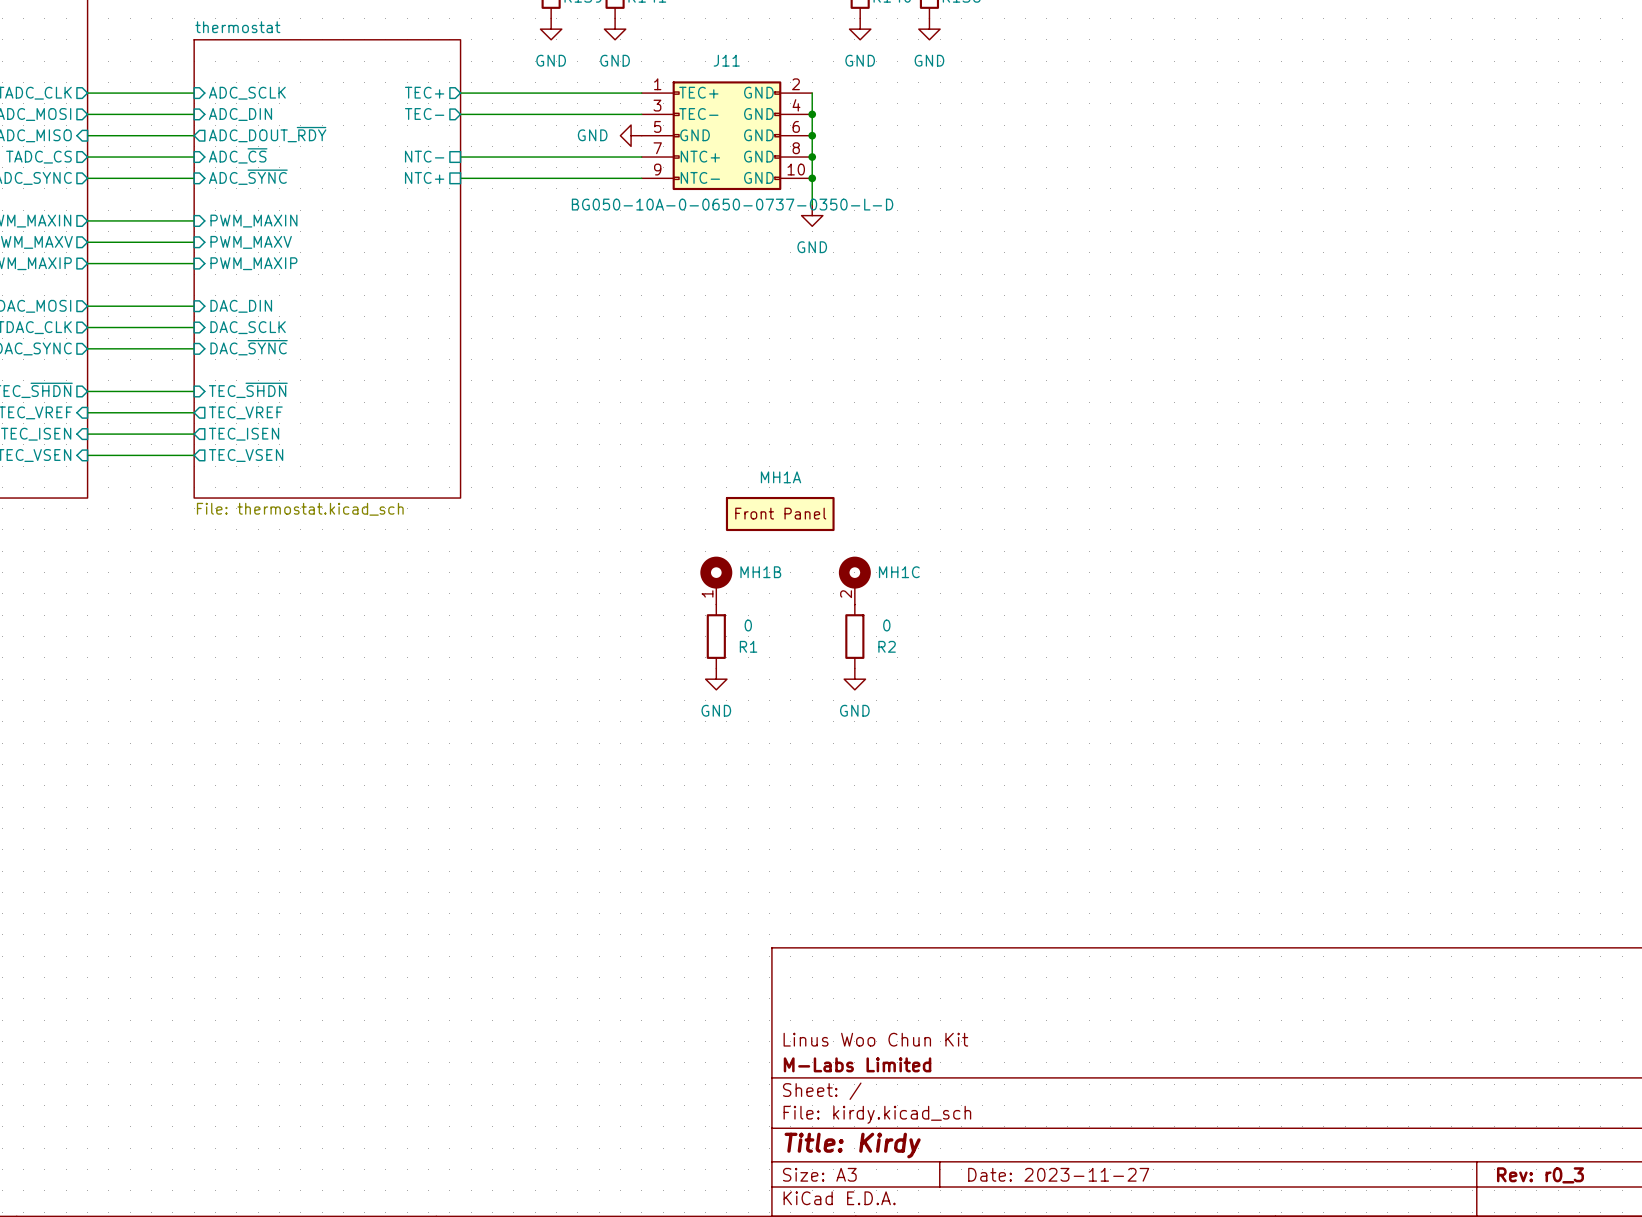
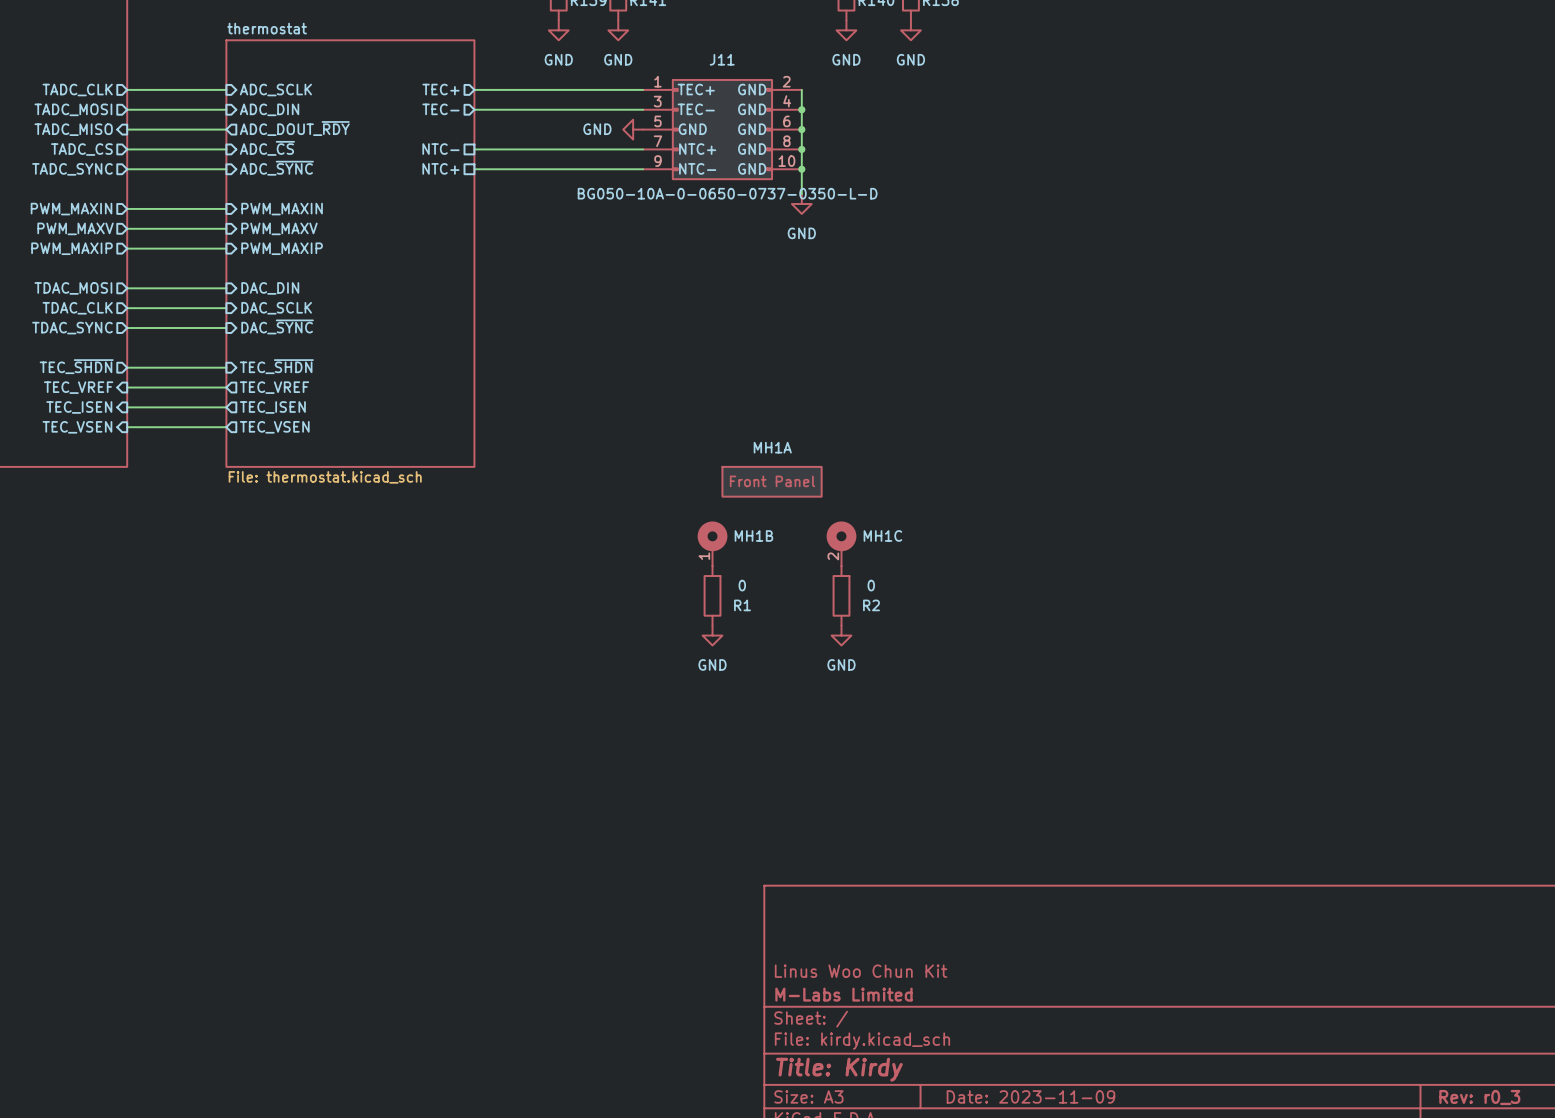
title block: Date: 2023-11-27 (1058, 1174) -> Date: 2023-11-09 (1030, 1096)

